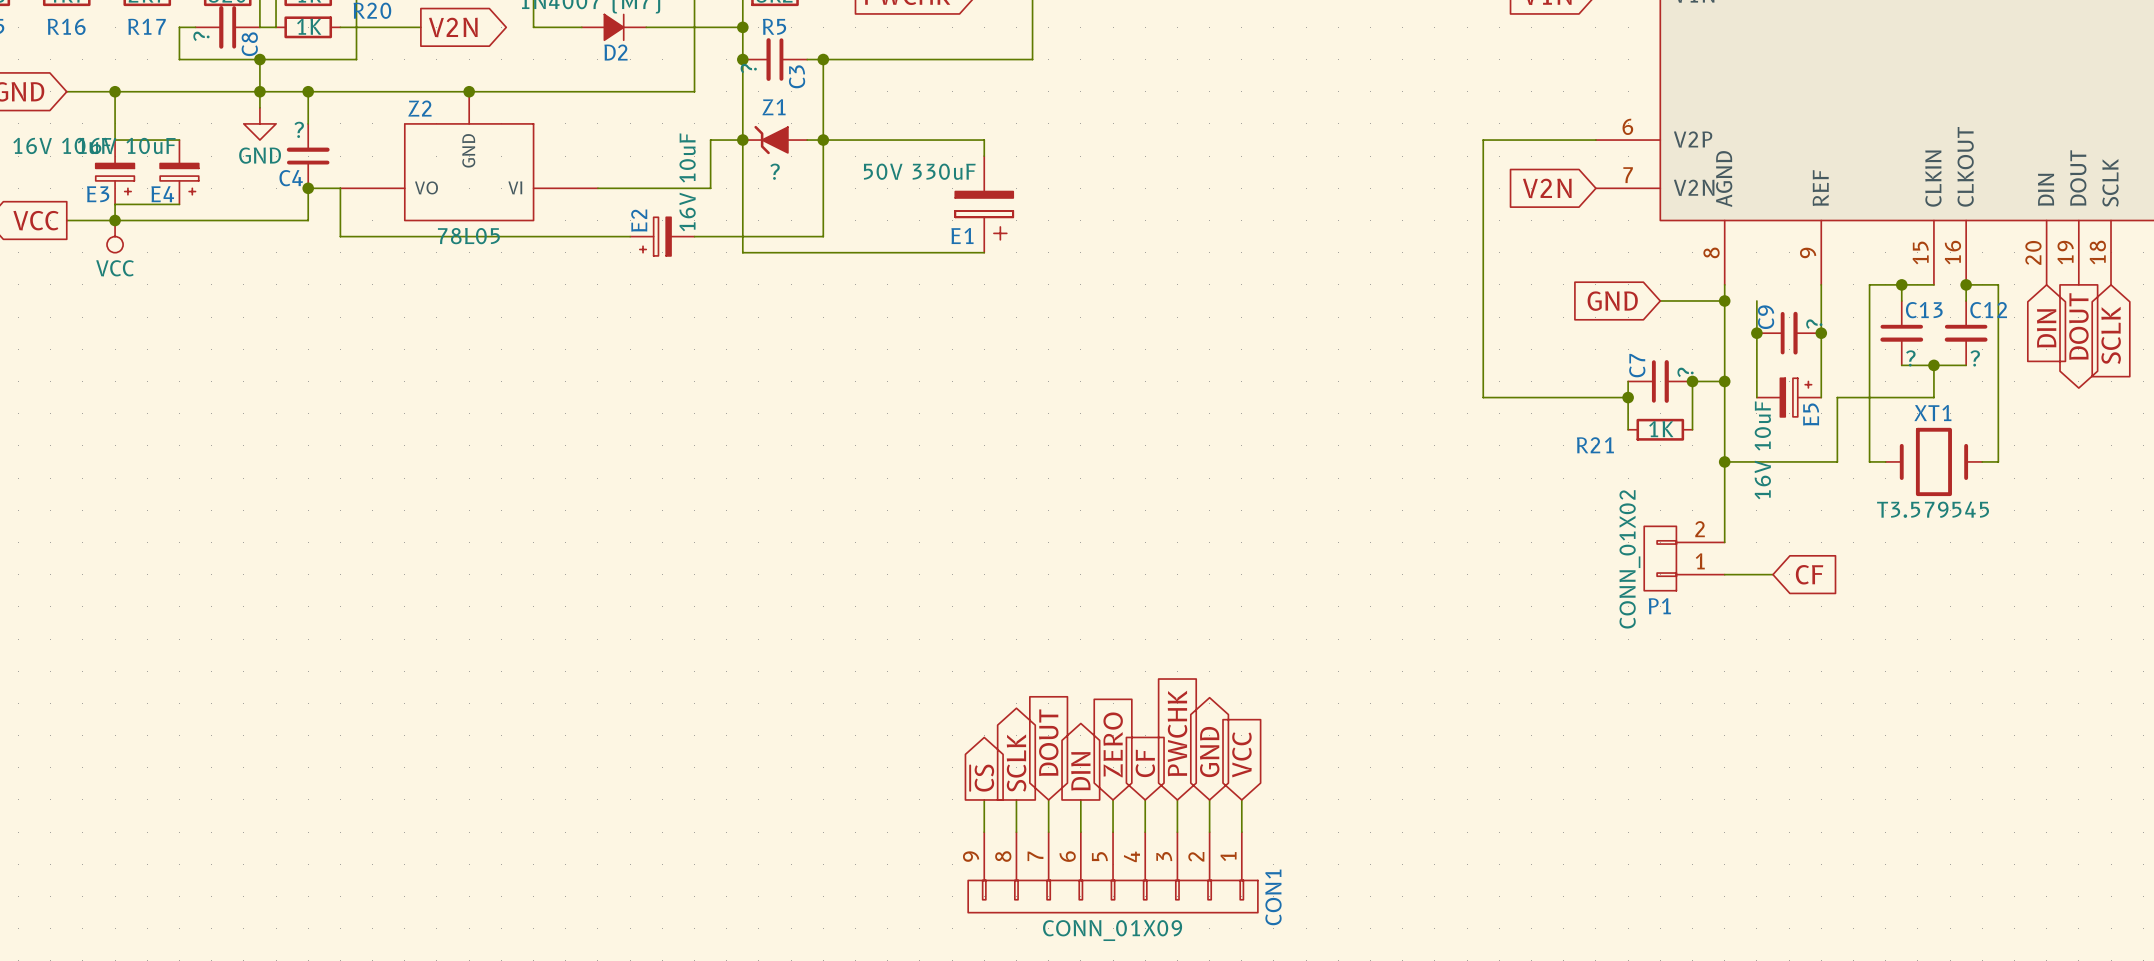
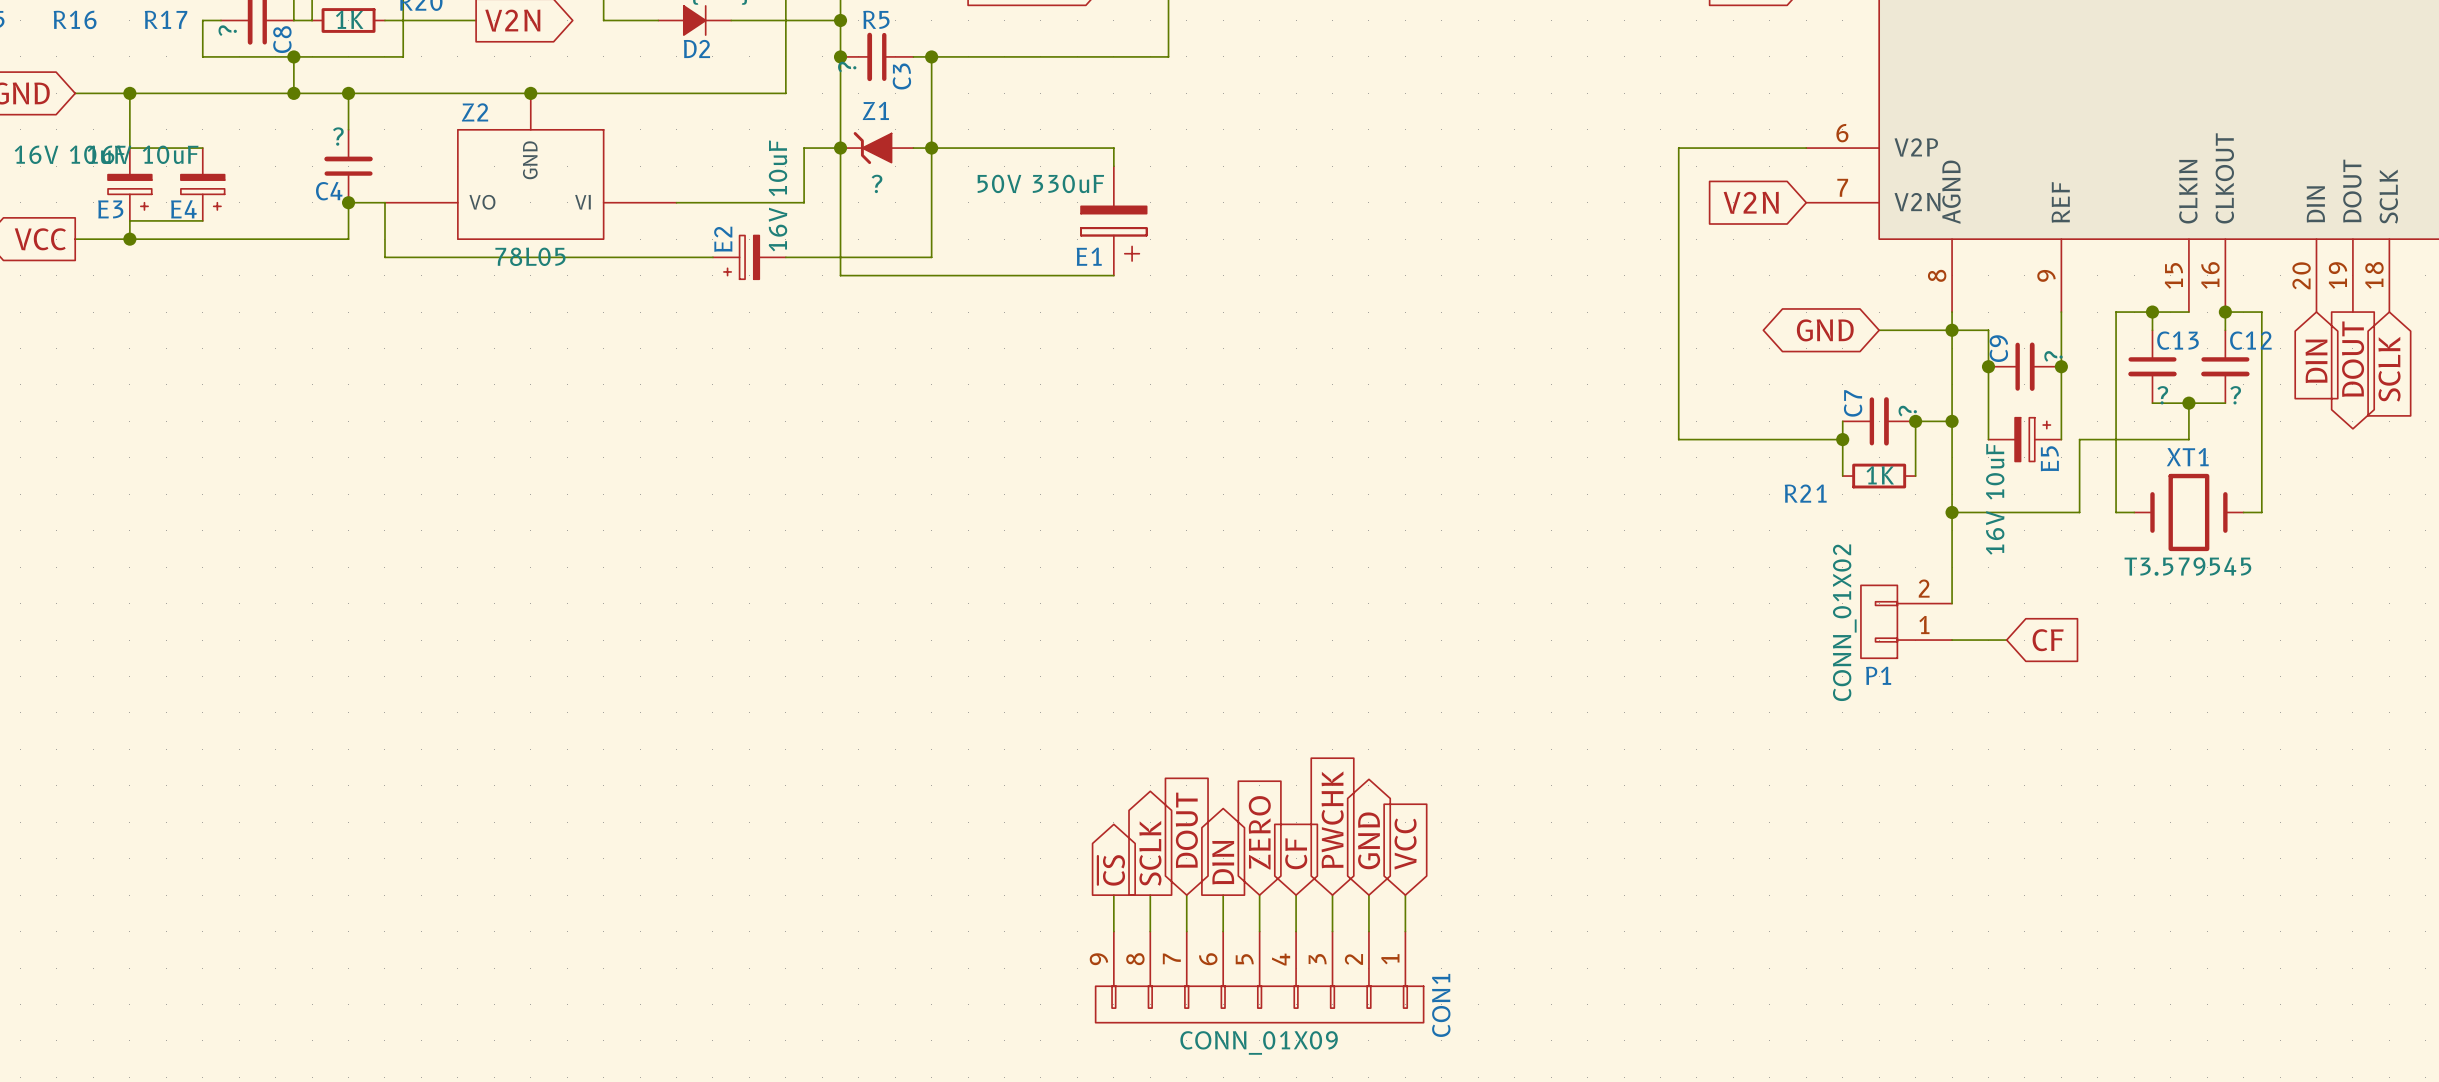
wire: (259, 91) (259, 107) -> none
power symbol: GND (259, 123) -> none
power symbol: VCC (115, 236) -> none
wire: none -> (1952, 330) (1988, 330)
global label shape: input (1612, 301) -> bidirectional (1825, 330)

